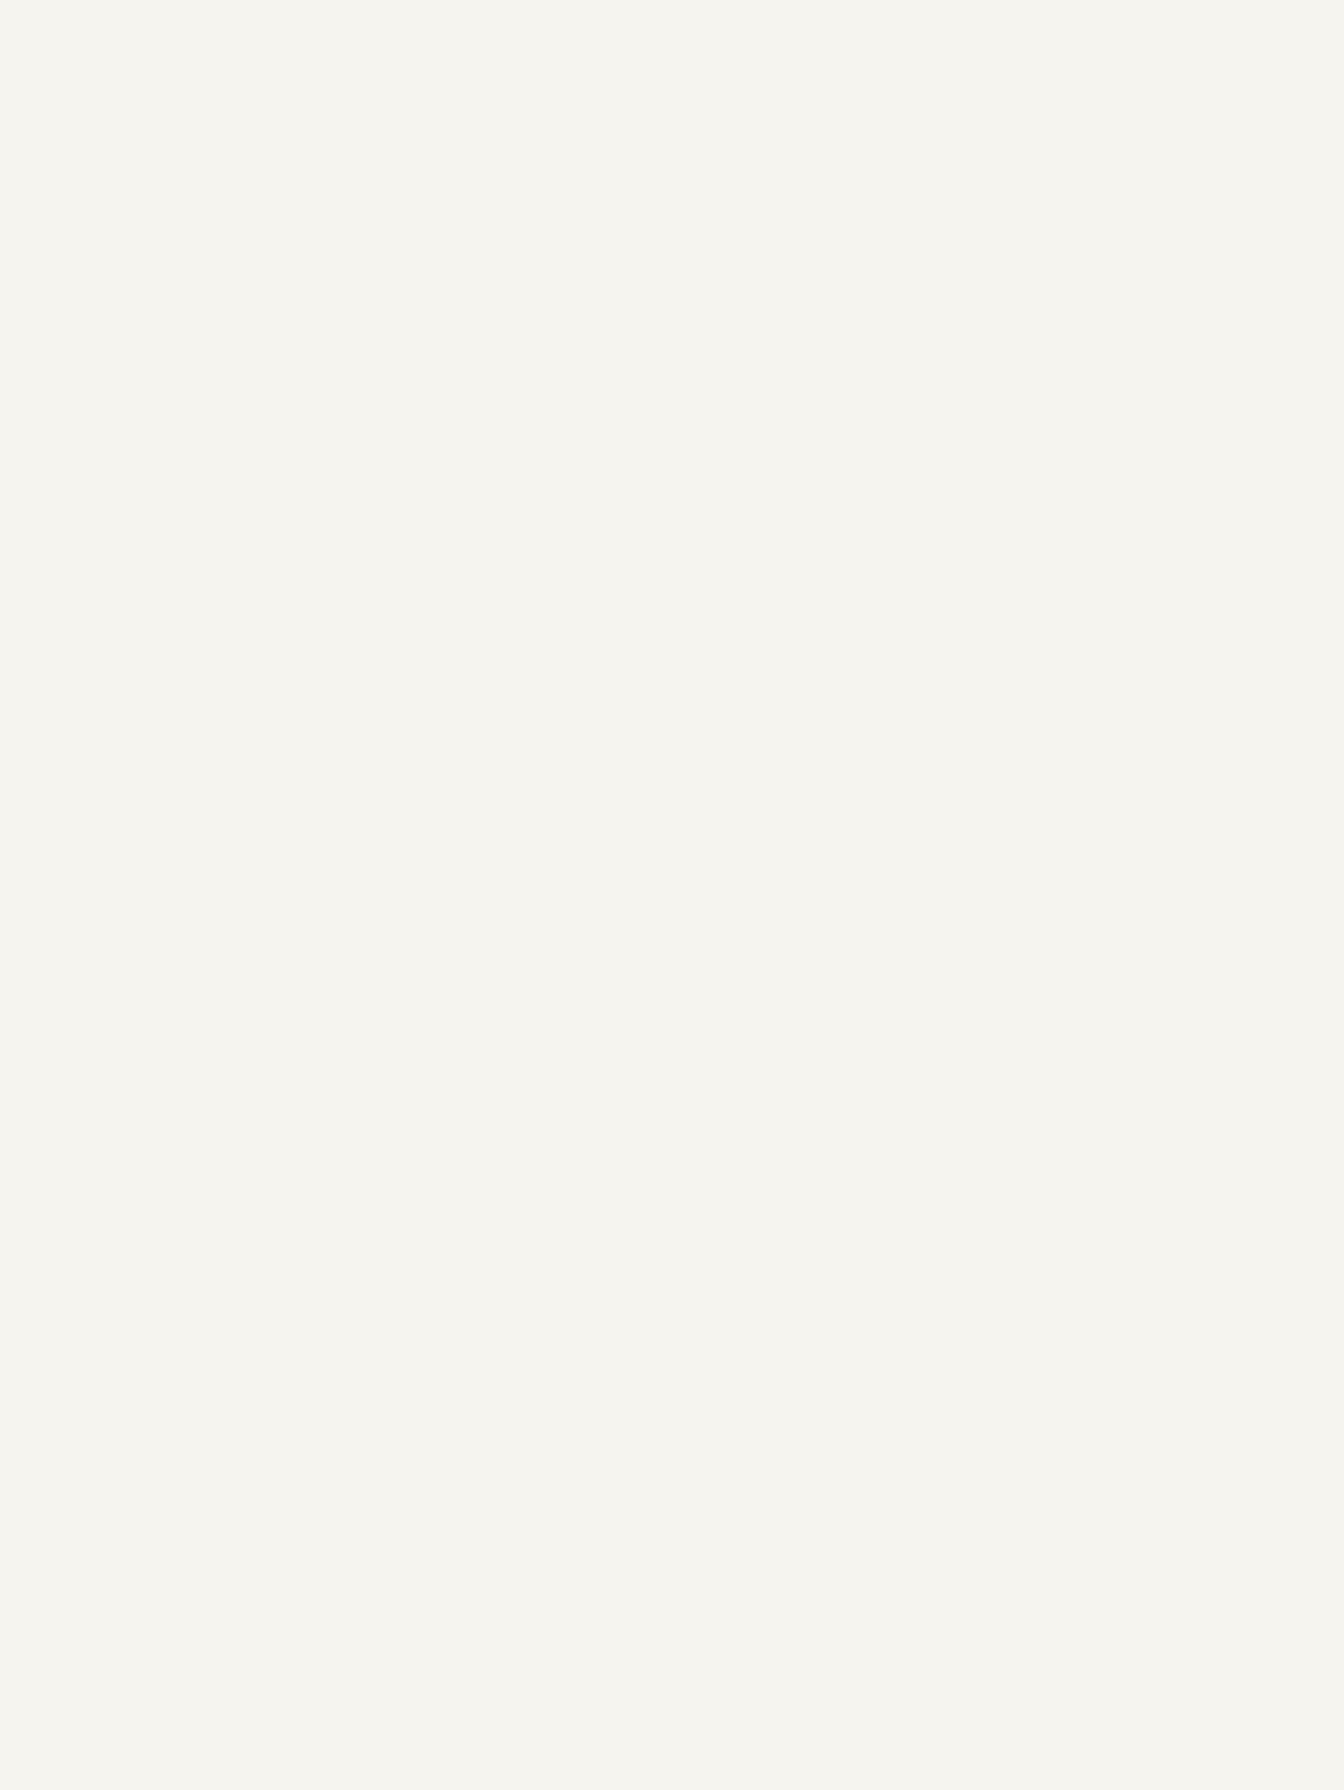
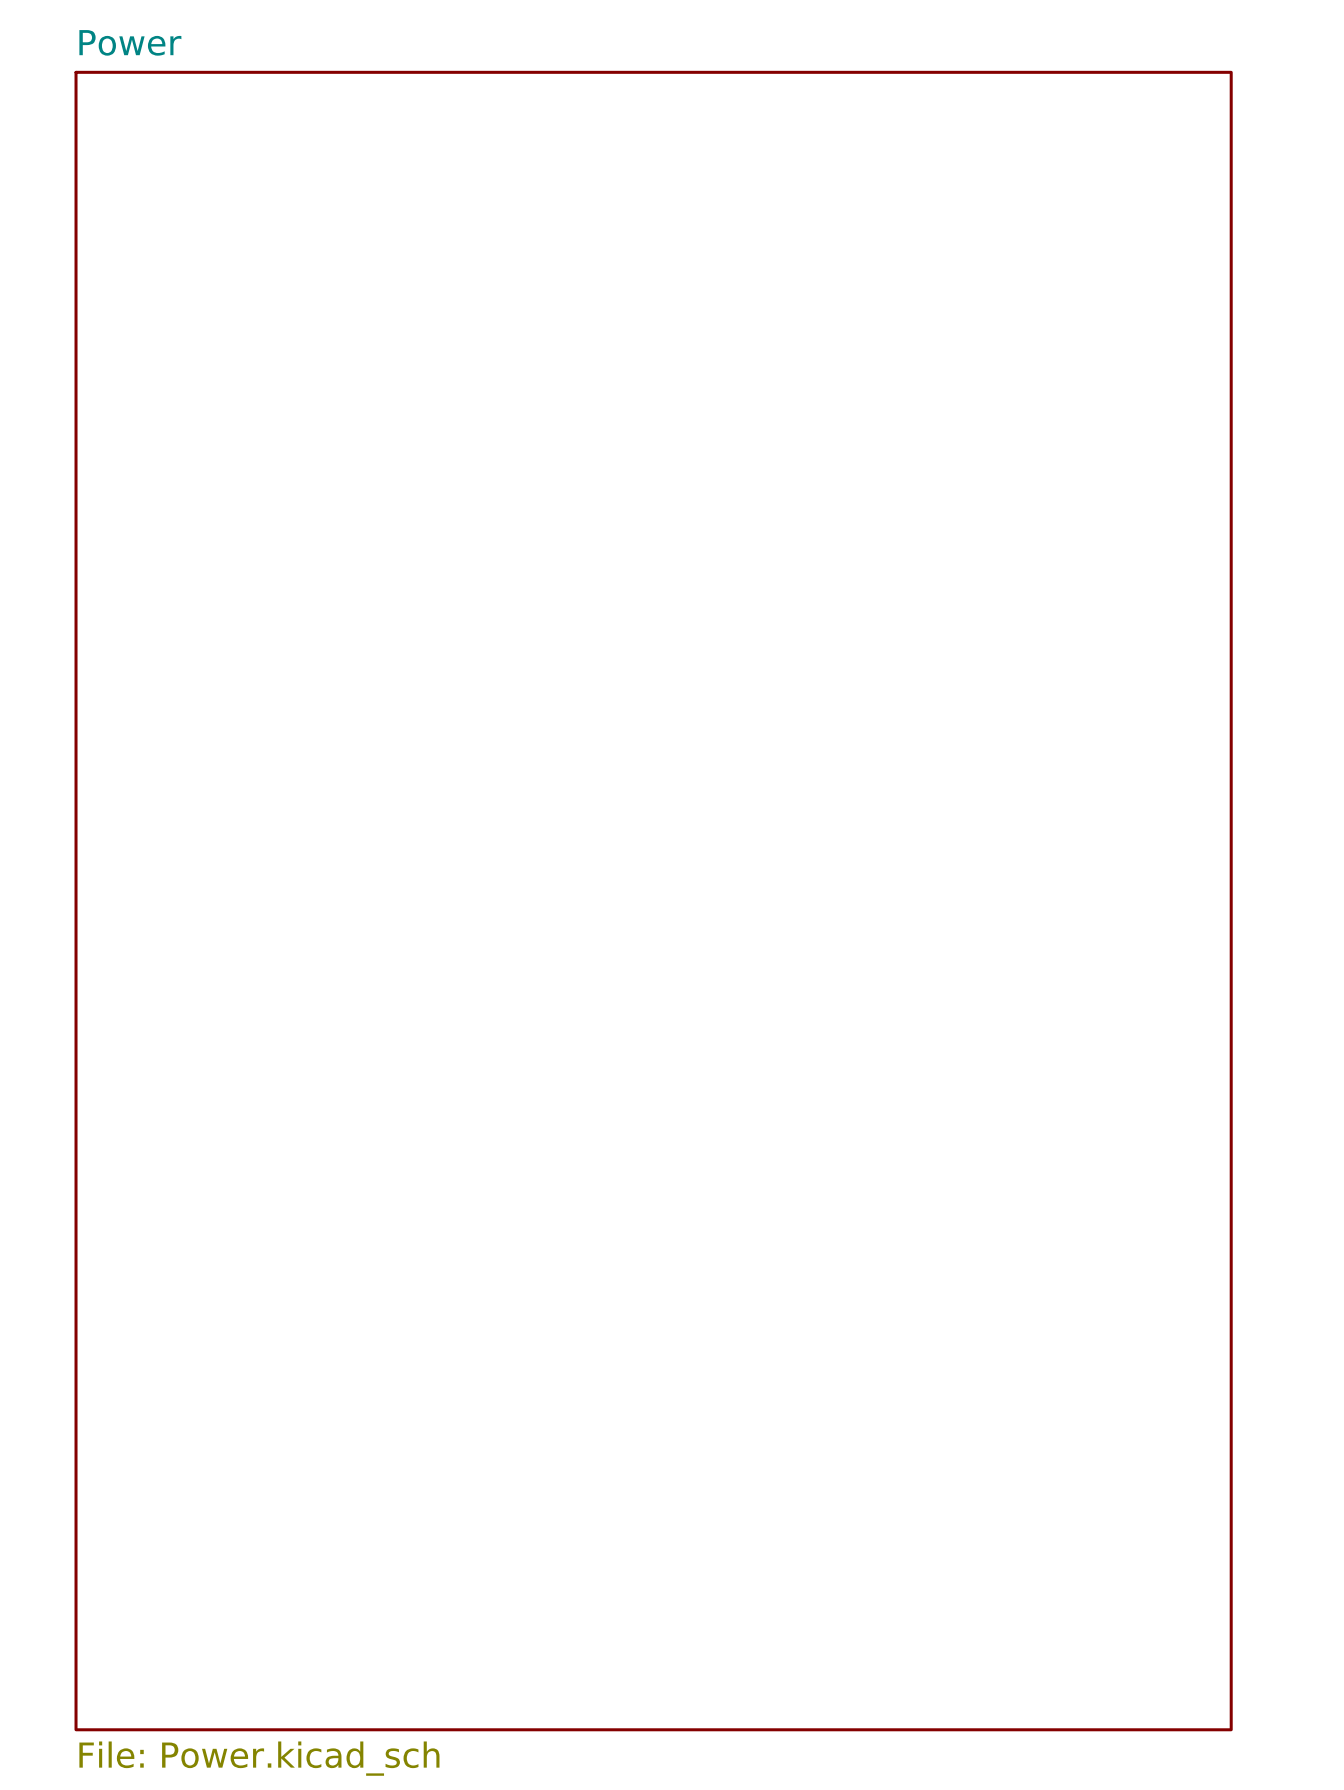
sheet Power: none -> File: Power.kicad_sch (653, 901)

